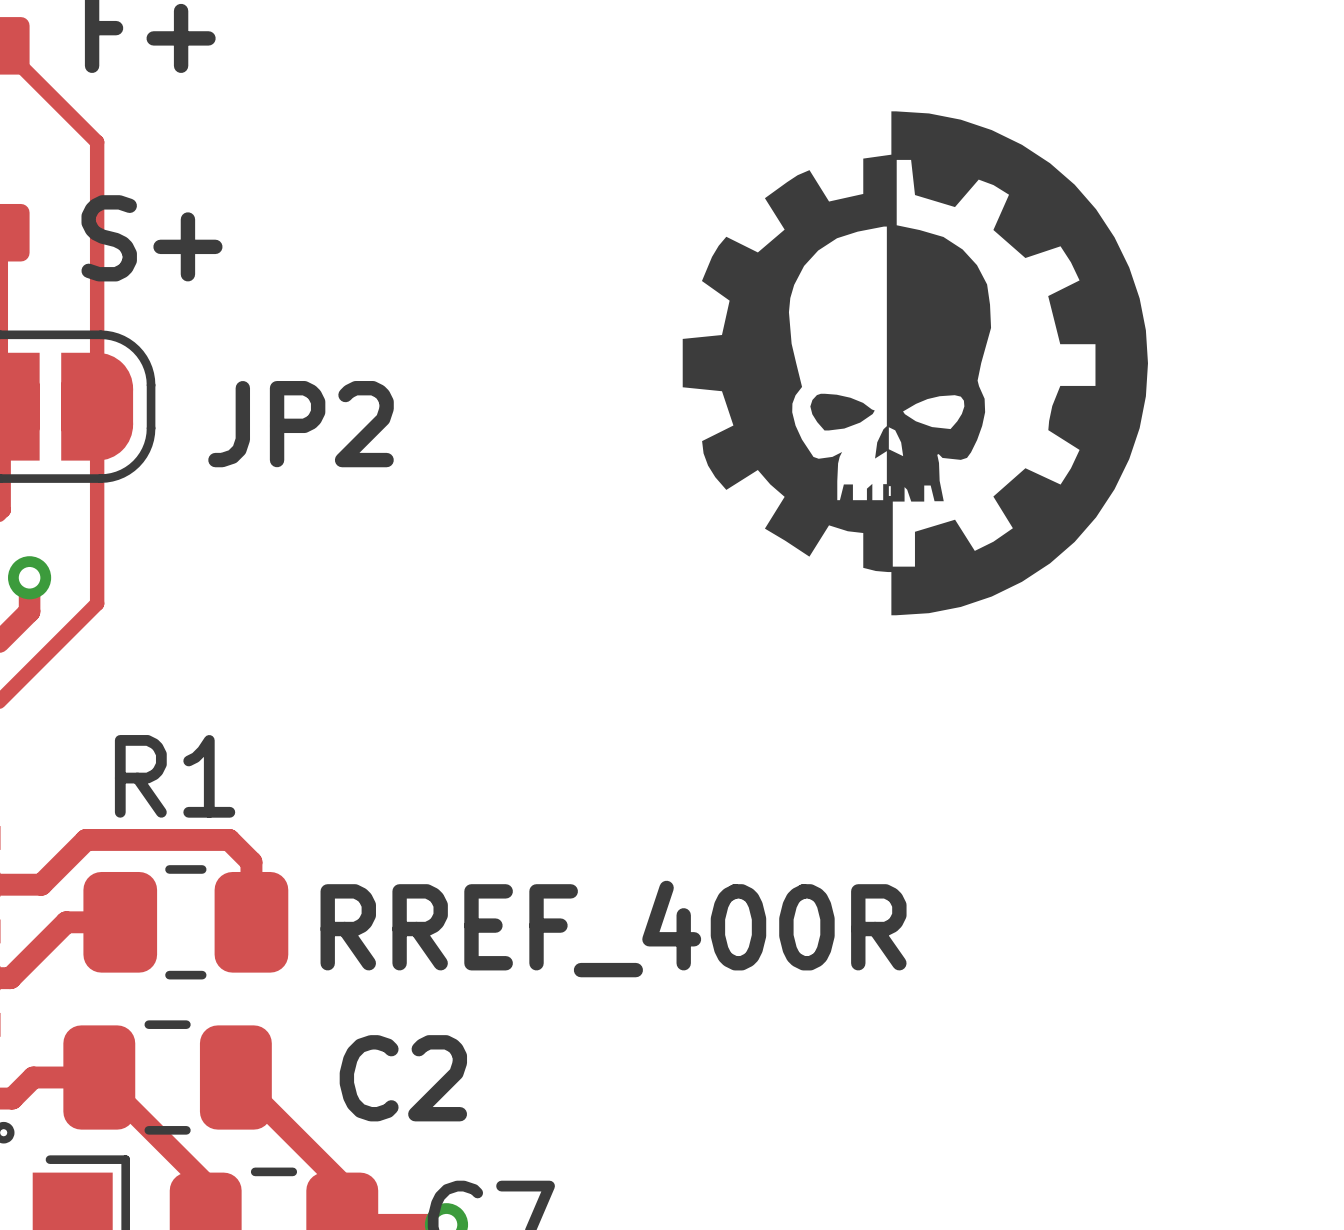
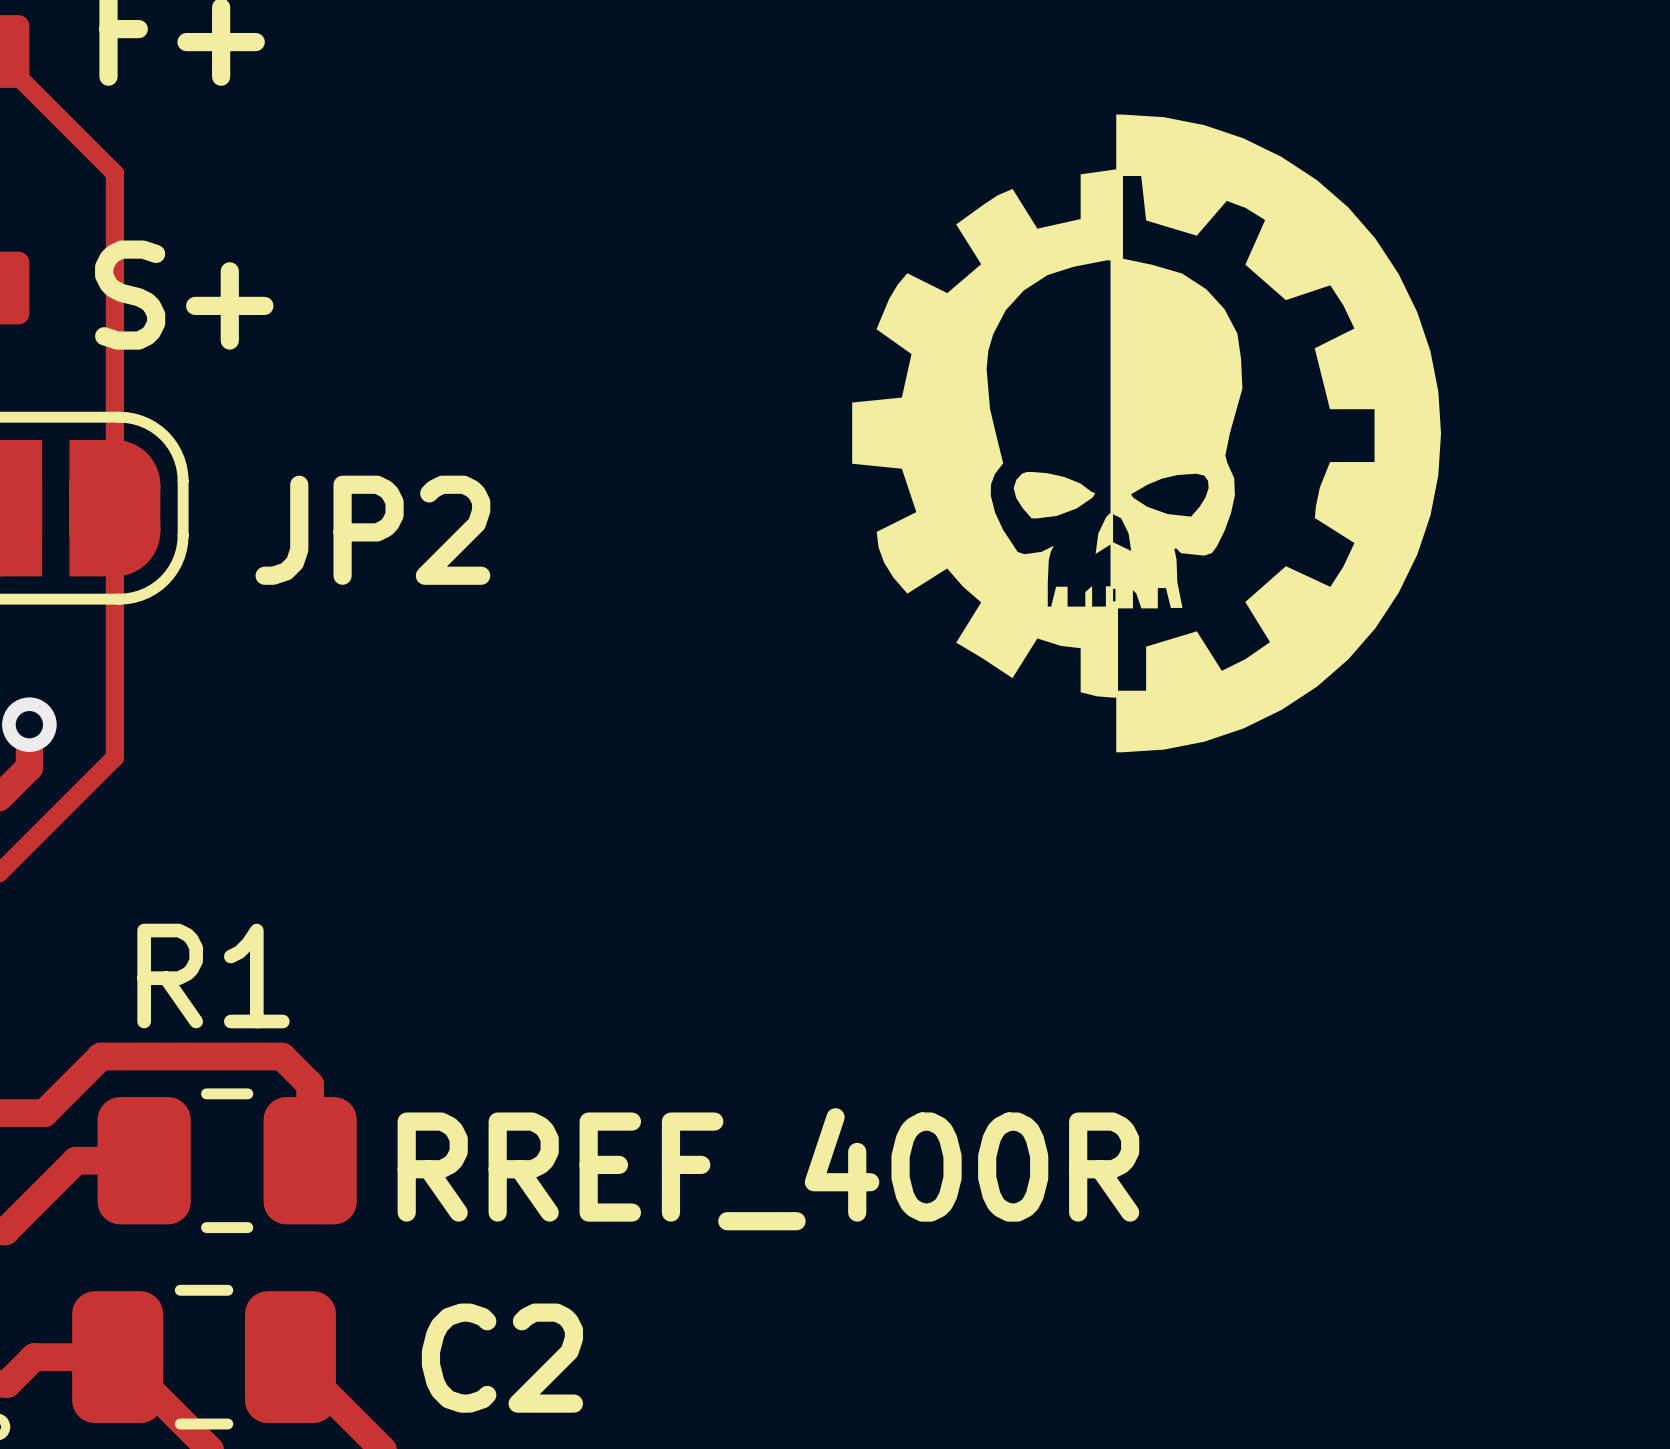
drawing position: (915, 363) -> (1146, 433)
drawing position: (842, 412) -> (1054, 495)

